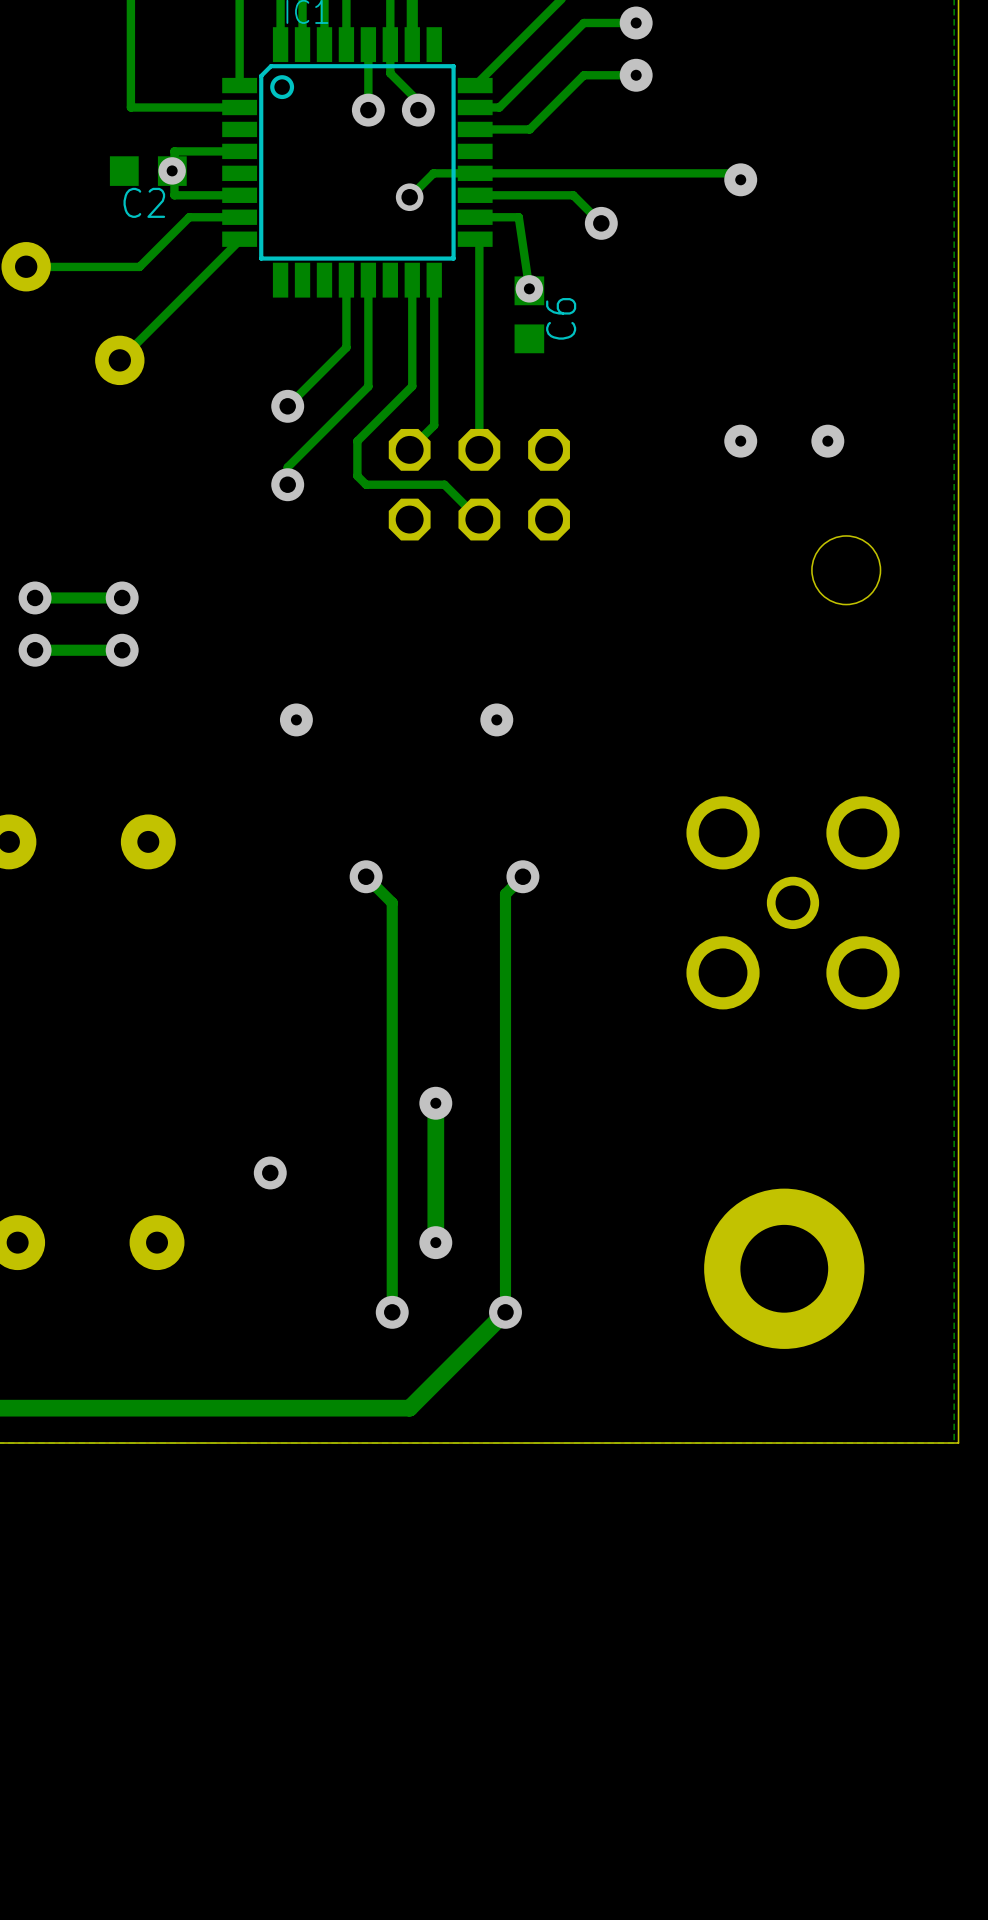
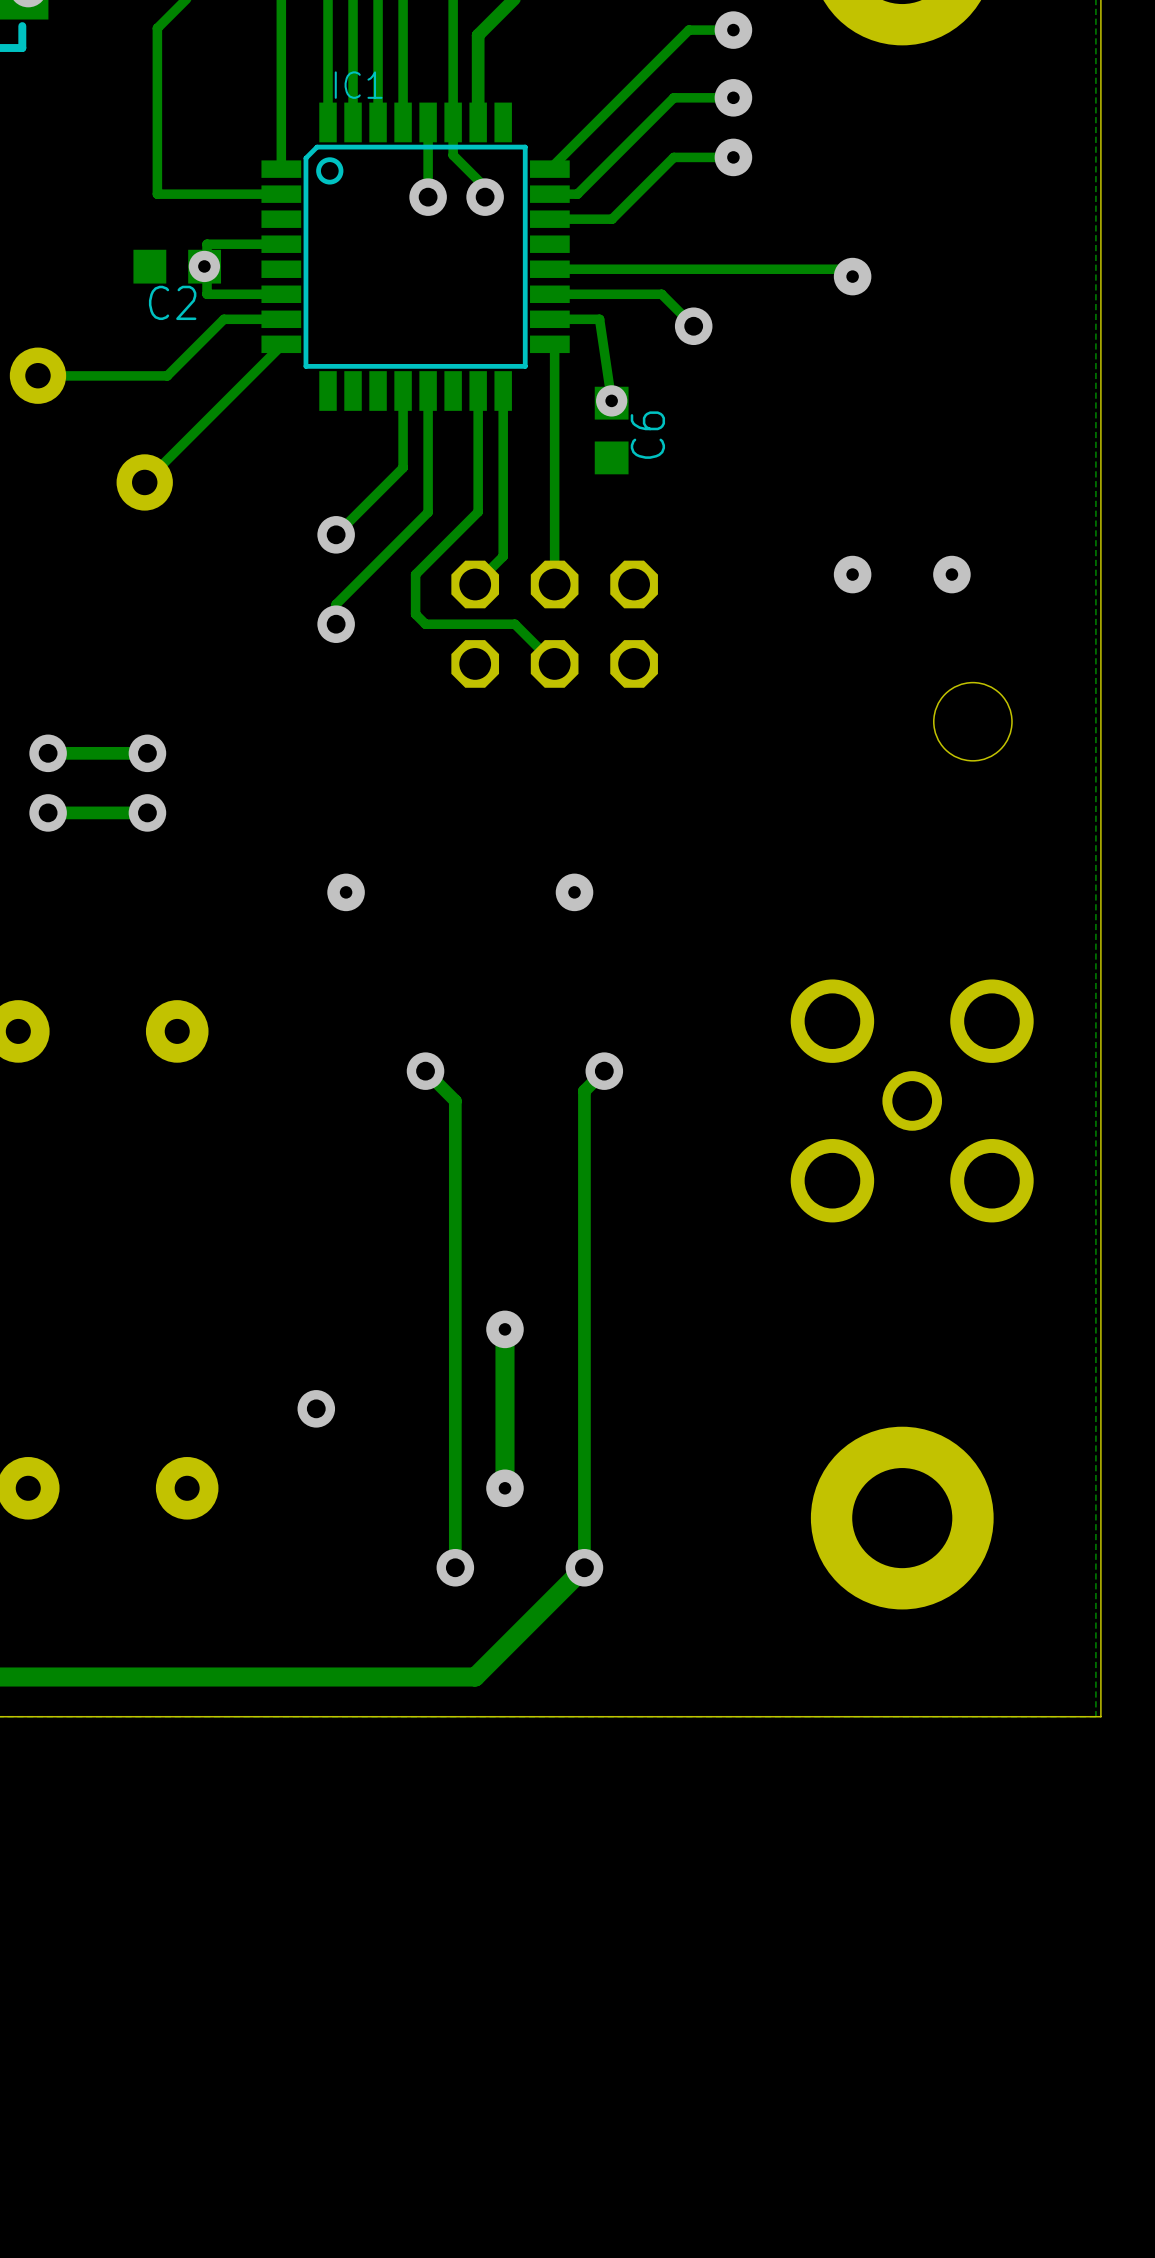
track: (475, 173) (433, 173) (409, 197) -> none
via: (409, 197) -> none

